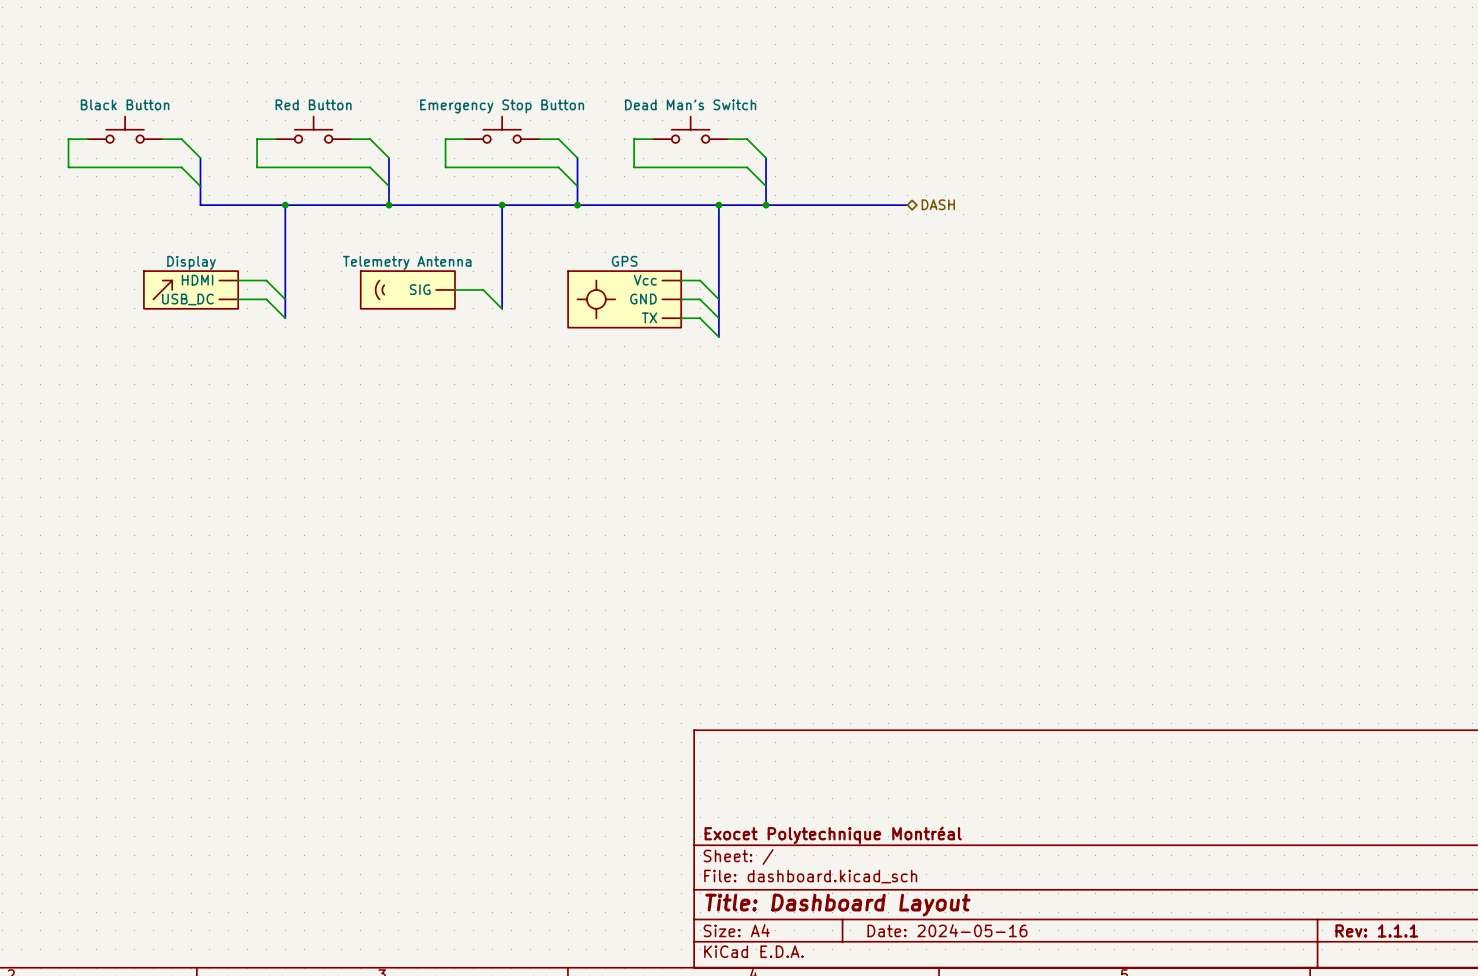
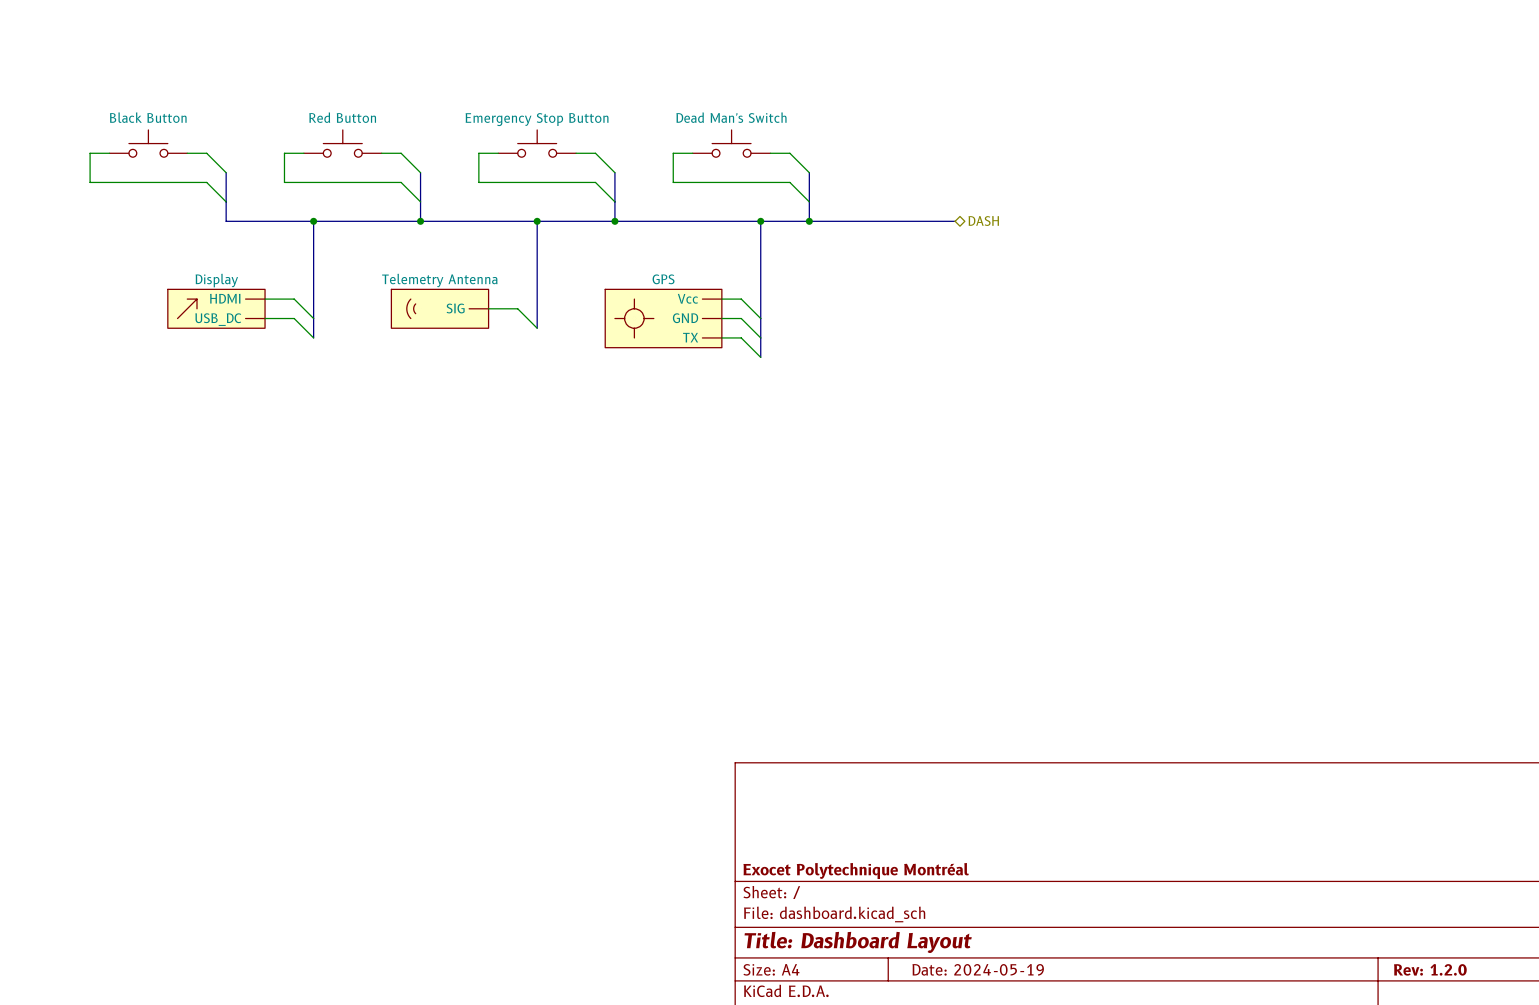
title block: Date: 2024-05-16 (947, 930) -> Date: 2024-05-19 (978, 969)
title block: Rev: 1.1.1 (1376, 930) -> Rev: 1.2.0 (1430, 969)

